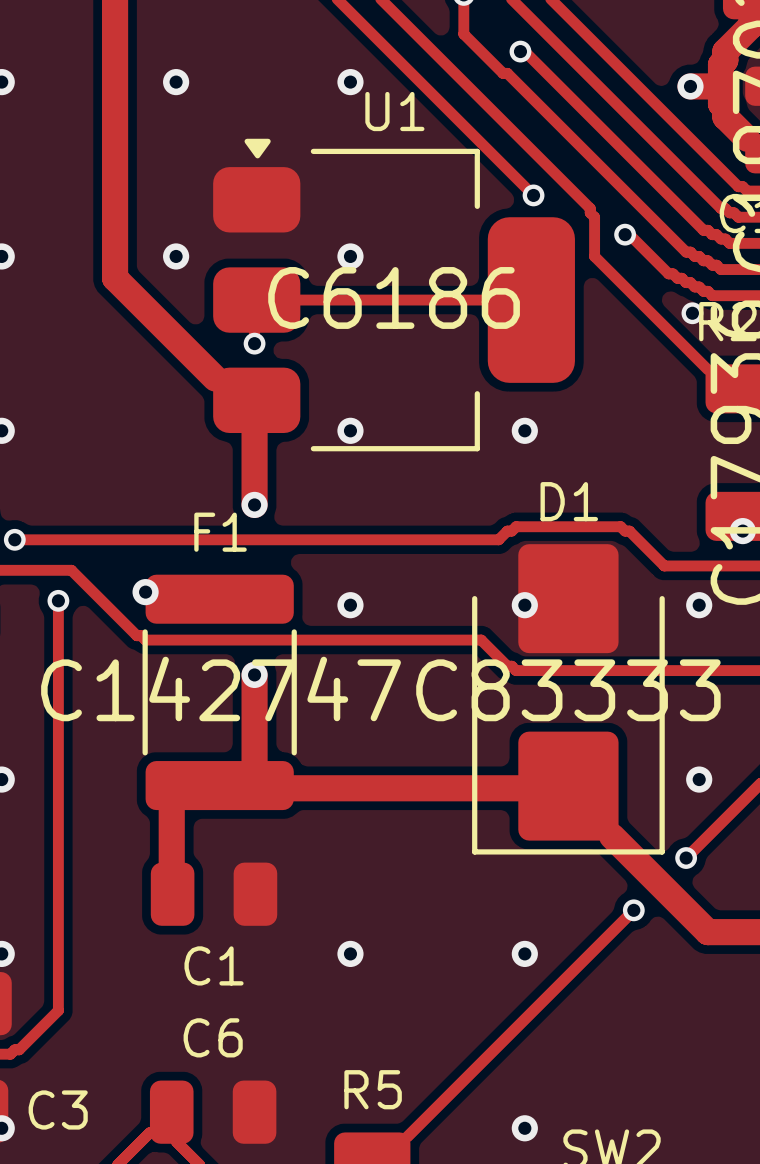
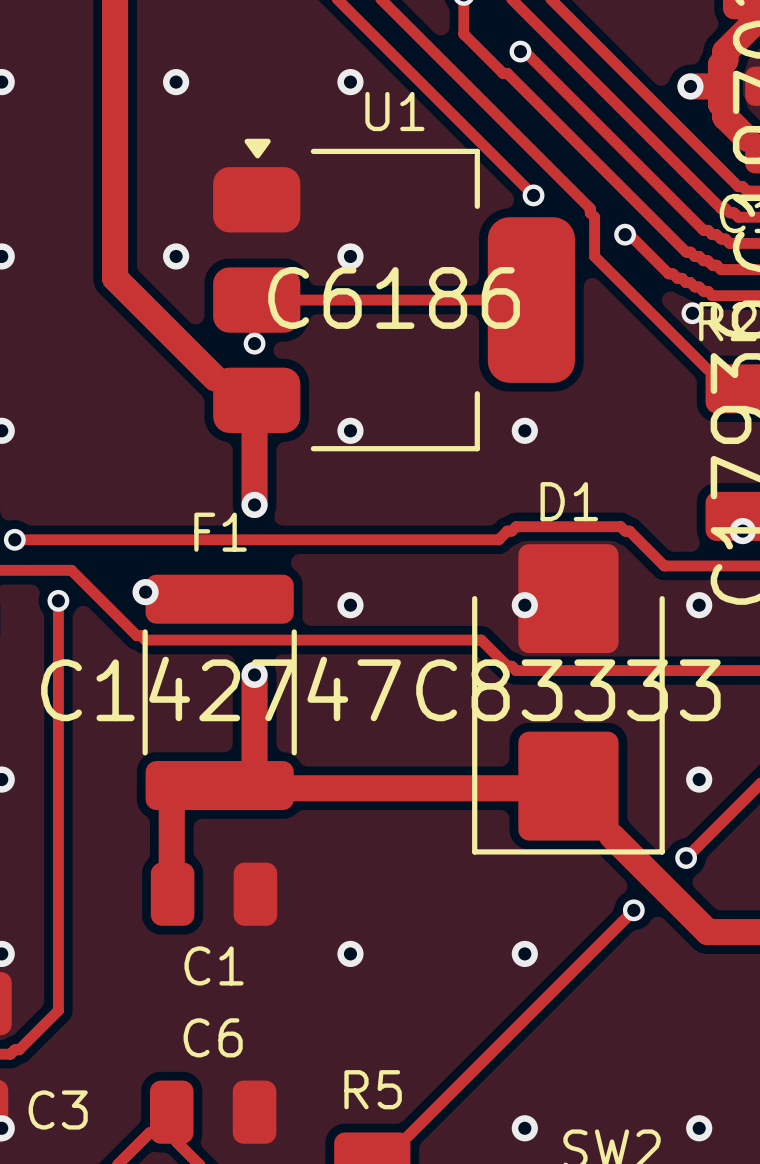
via: none -> (699, 1128)

